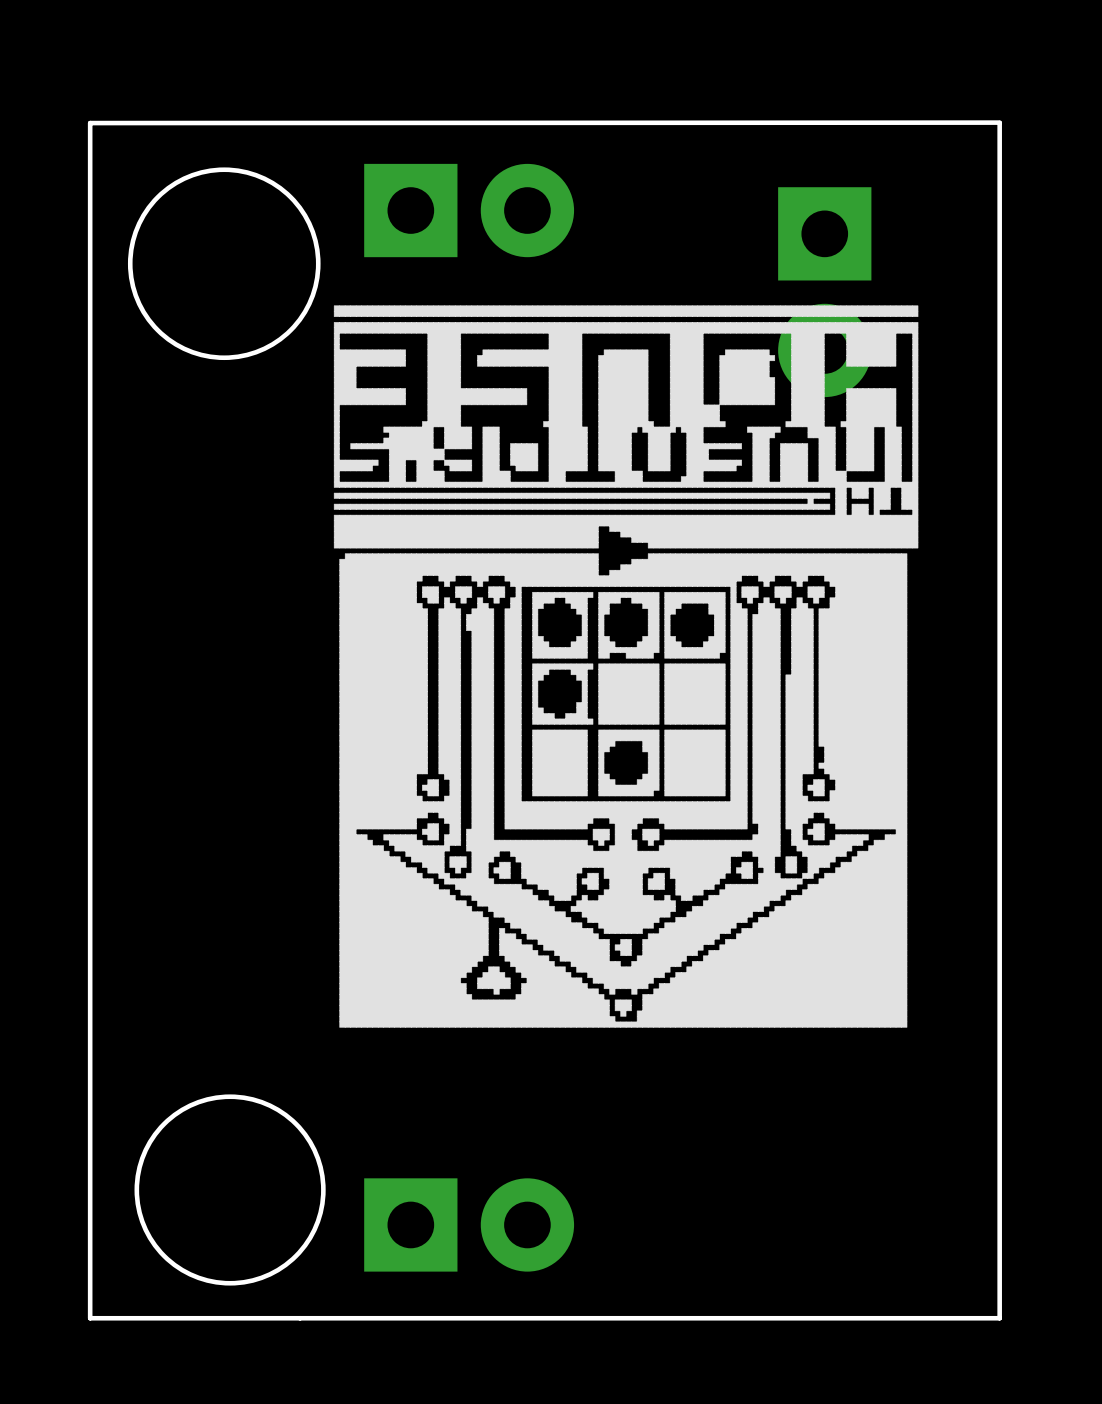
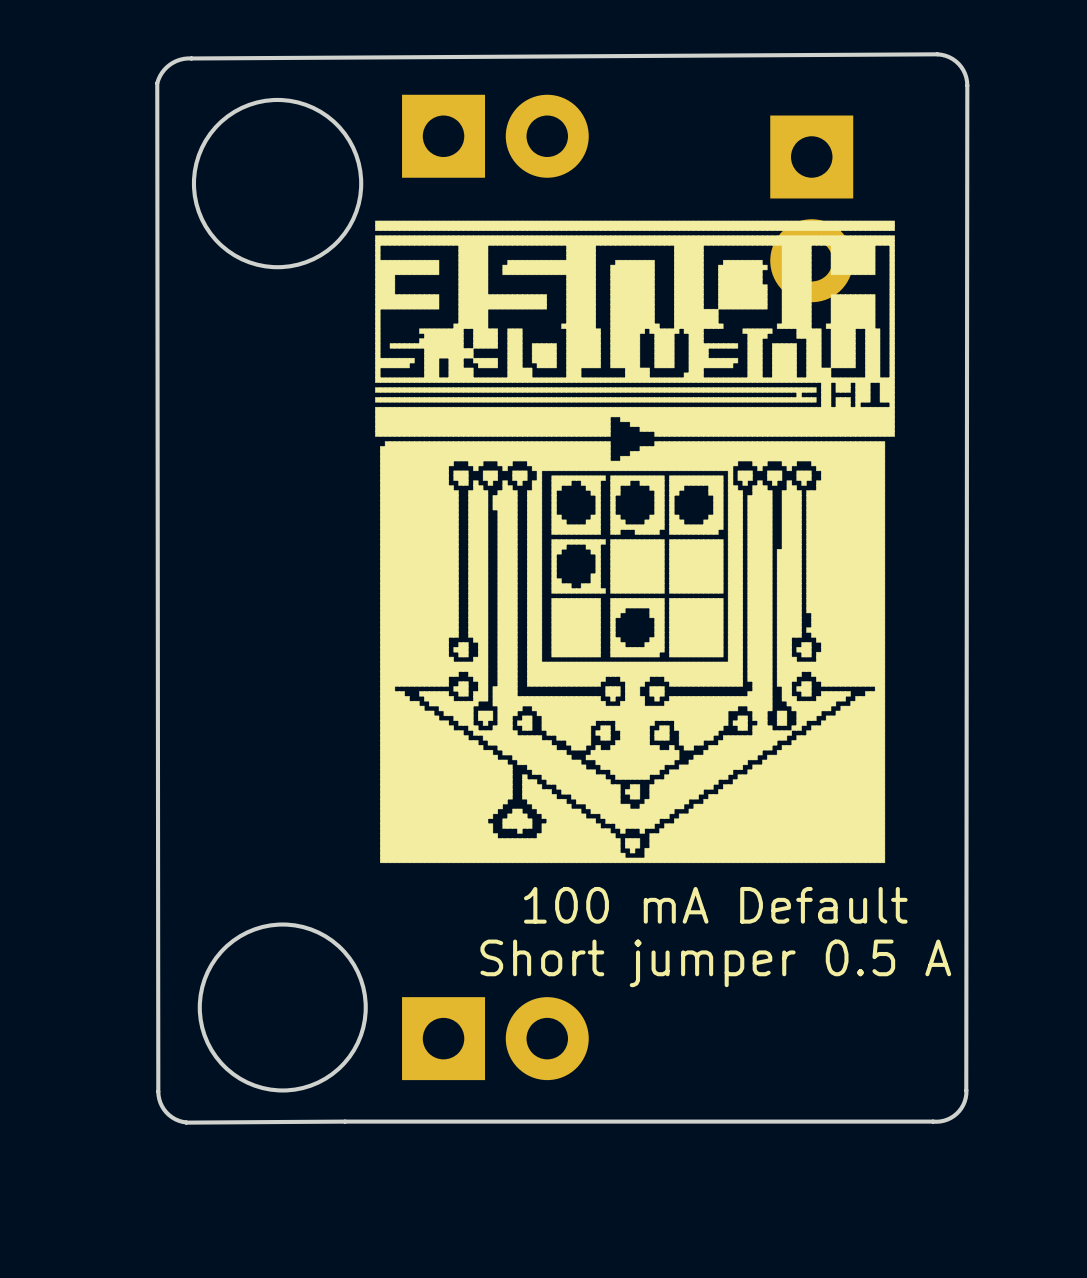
board edge: none -> (937, 54) (187, 58) (173, 62) (162, 72) (157, 83) (158, 1091) (160, 1102) (166, 1112) (175, 1119) (186, 1122)
board edge: none -> (937, 54) (949, 57) (958, 63) (965, 73) (967, 85) (966, 1090)
board edge: (999, 122) (90, 123) (90, 1318) (300, 1318) -> (186, 1122) (345, 1121)
board edge: (999, 123) (999, 1318) (961, 1318) -> (966, 1090) (963, 1104) (956, 1113) (944, 1120) (933, 1121)
text: none -> 100 mA Default (715, 905)
text: none -> Short jumper 0.5 A (715, 963)

